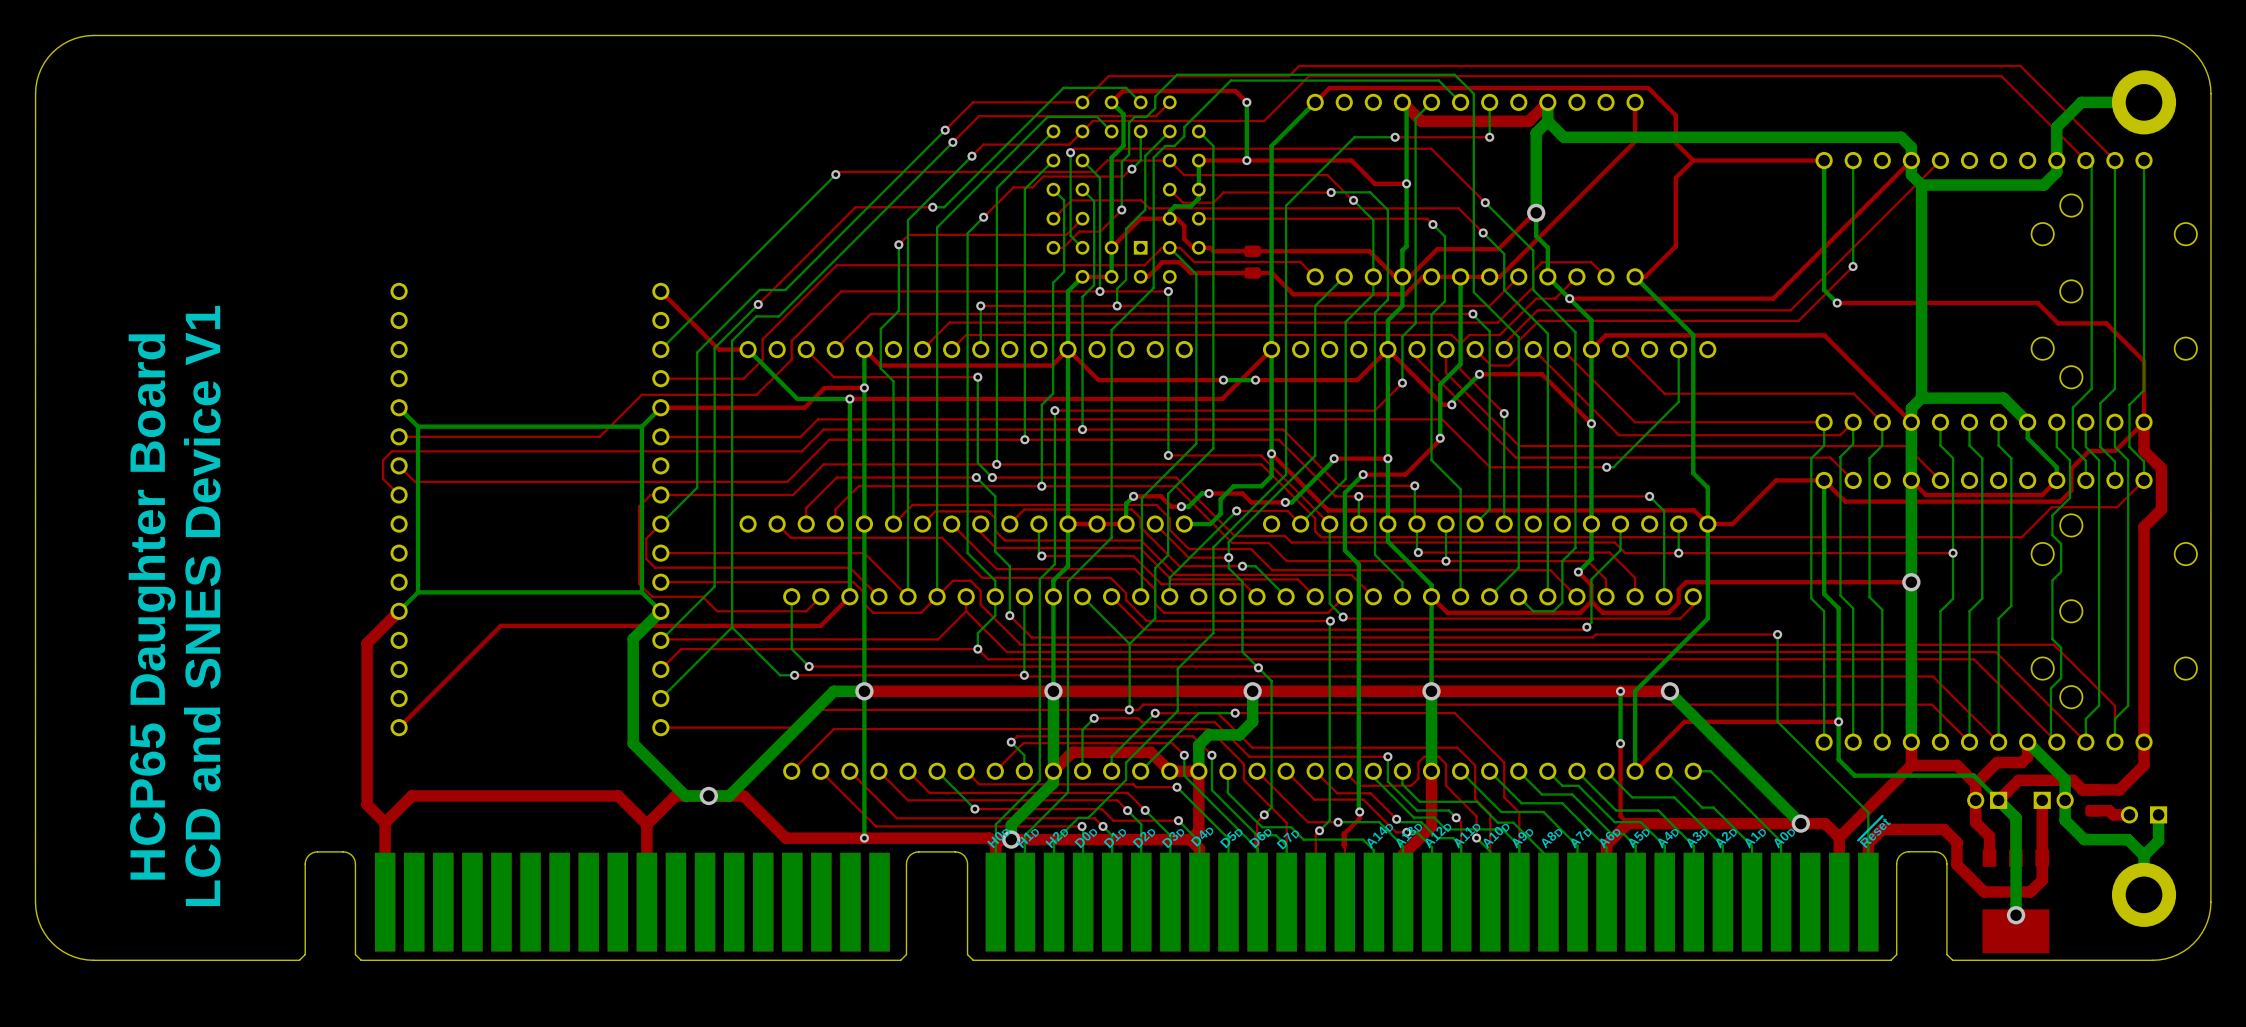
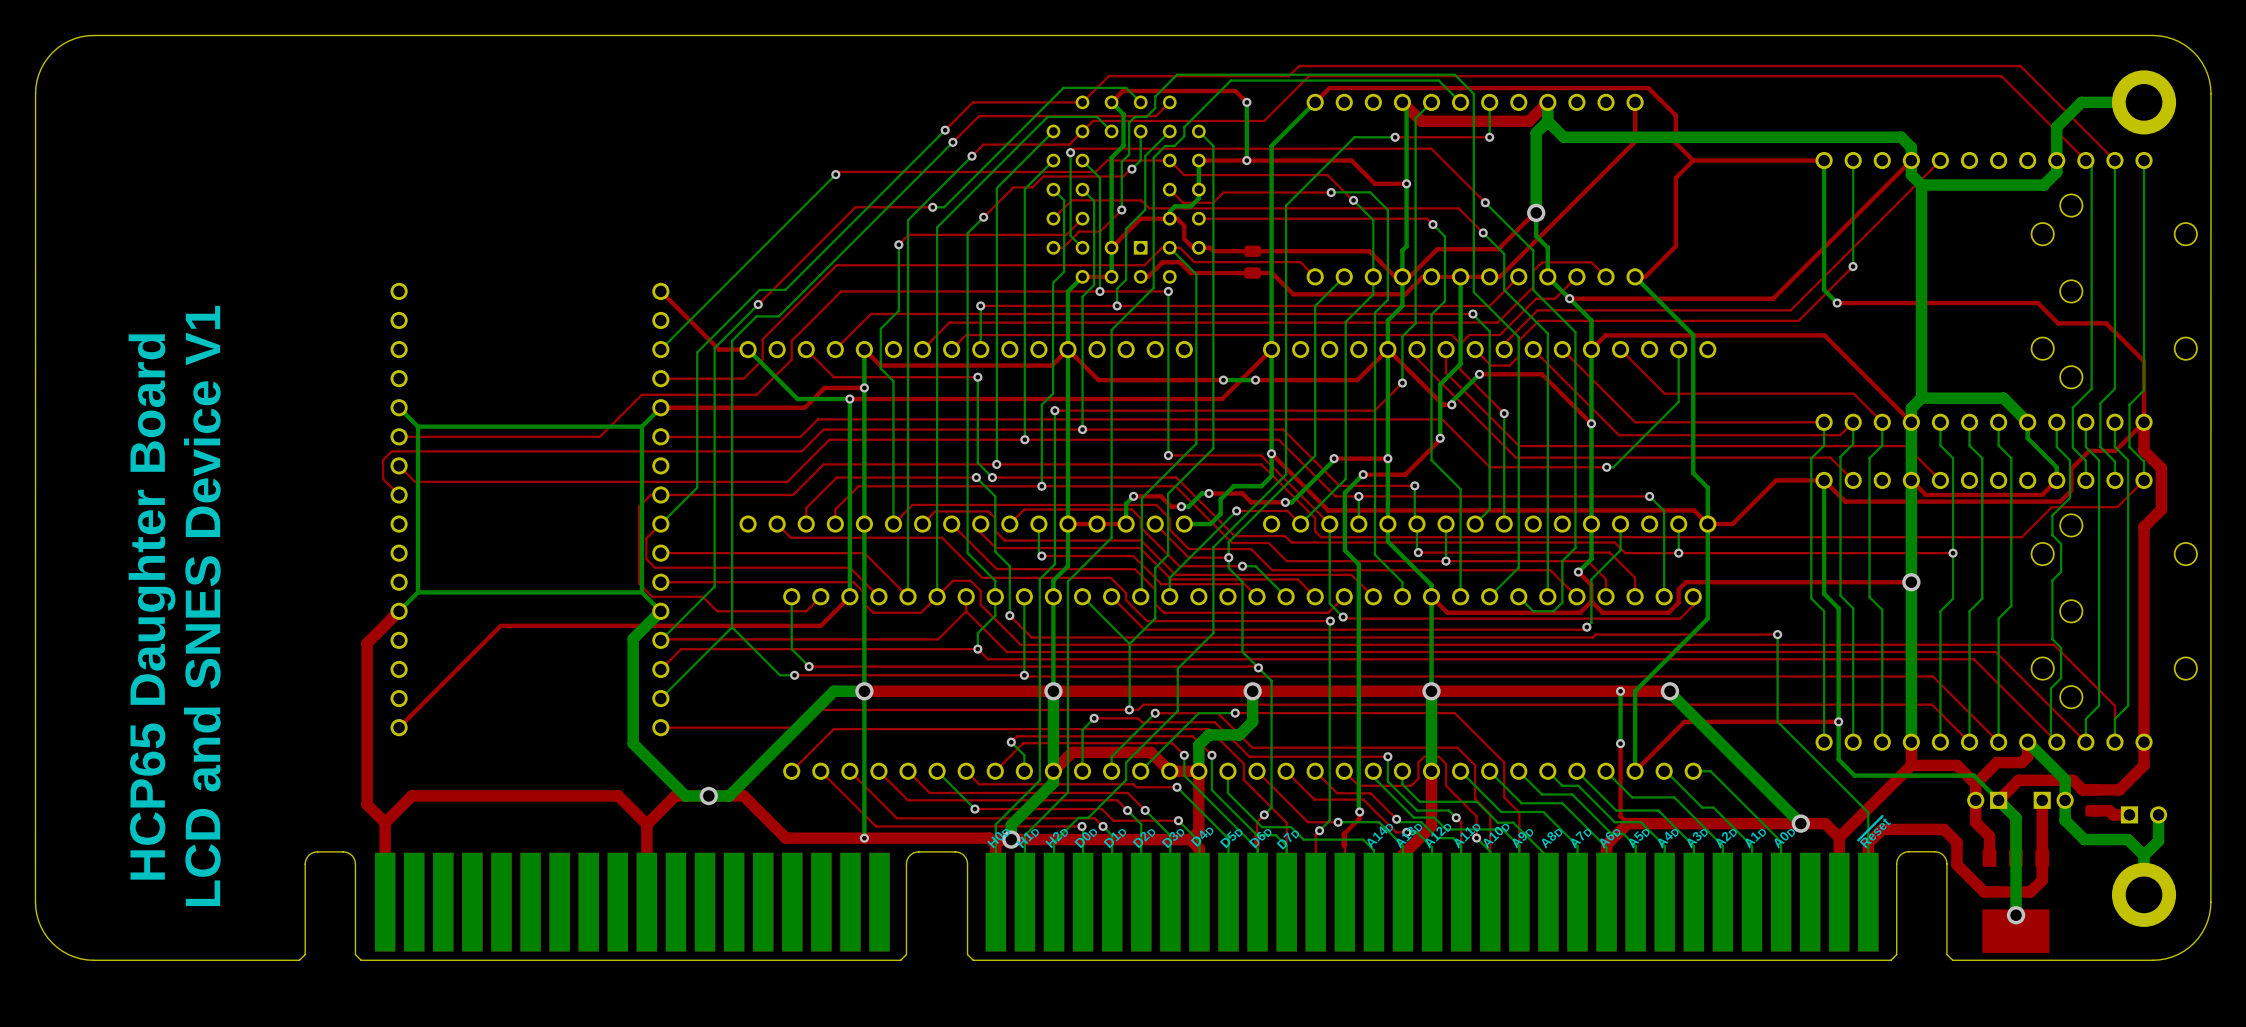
part rotation: 0° (2144, 814) -> 180° (2144, 814)

